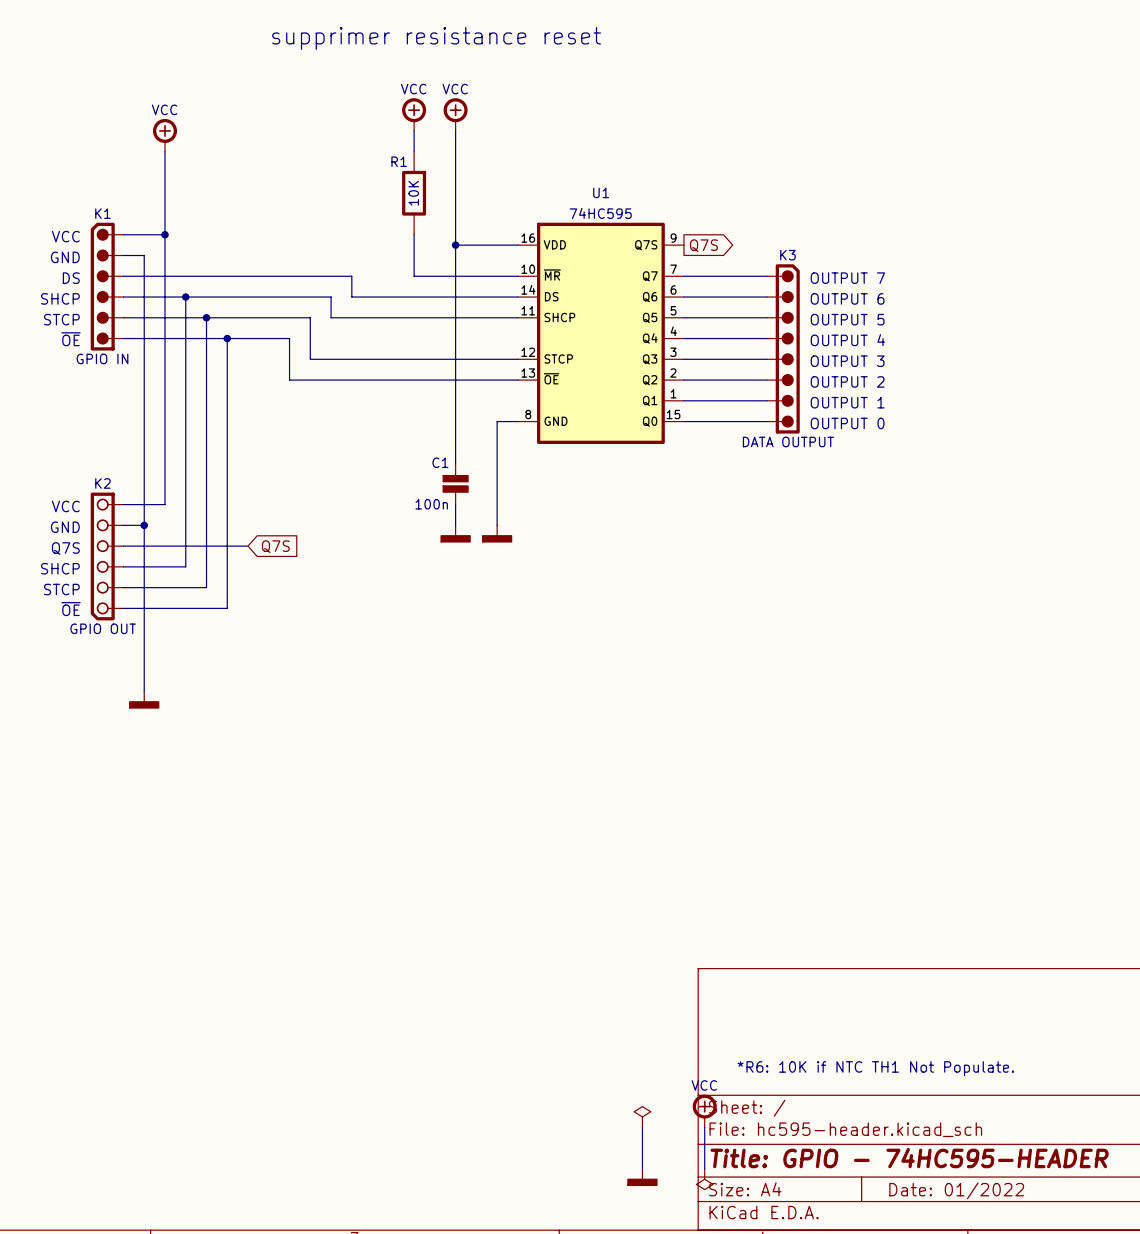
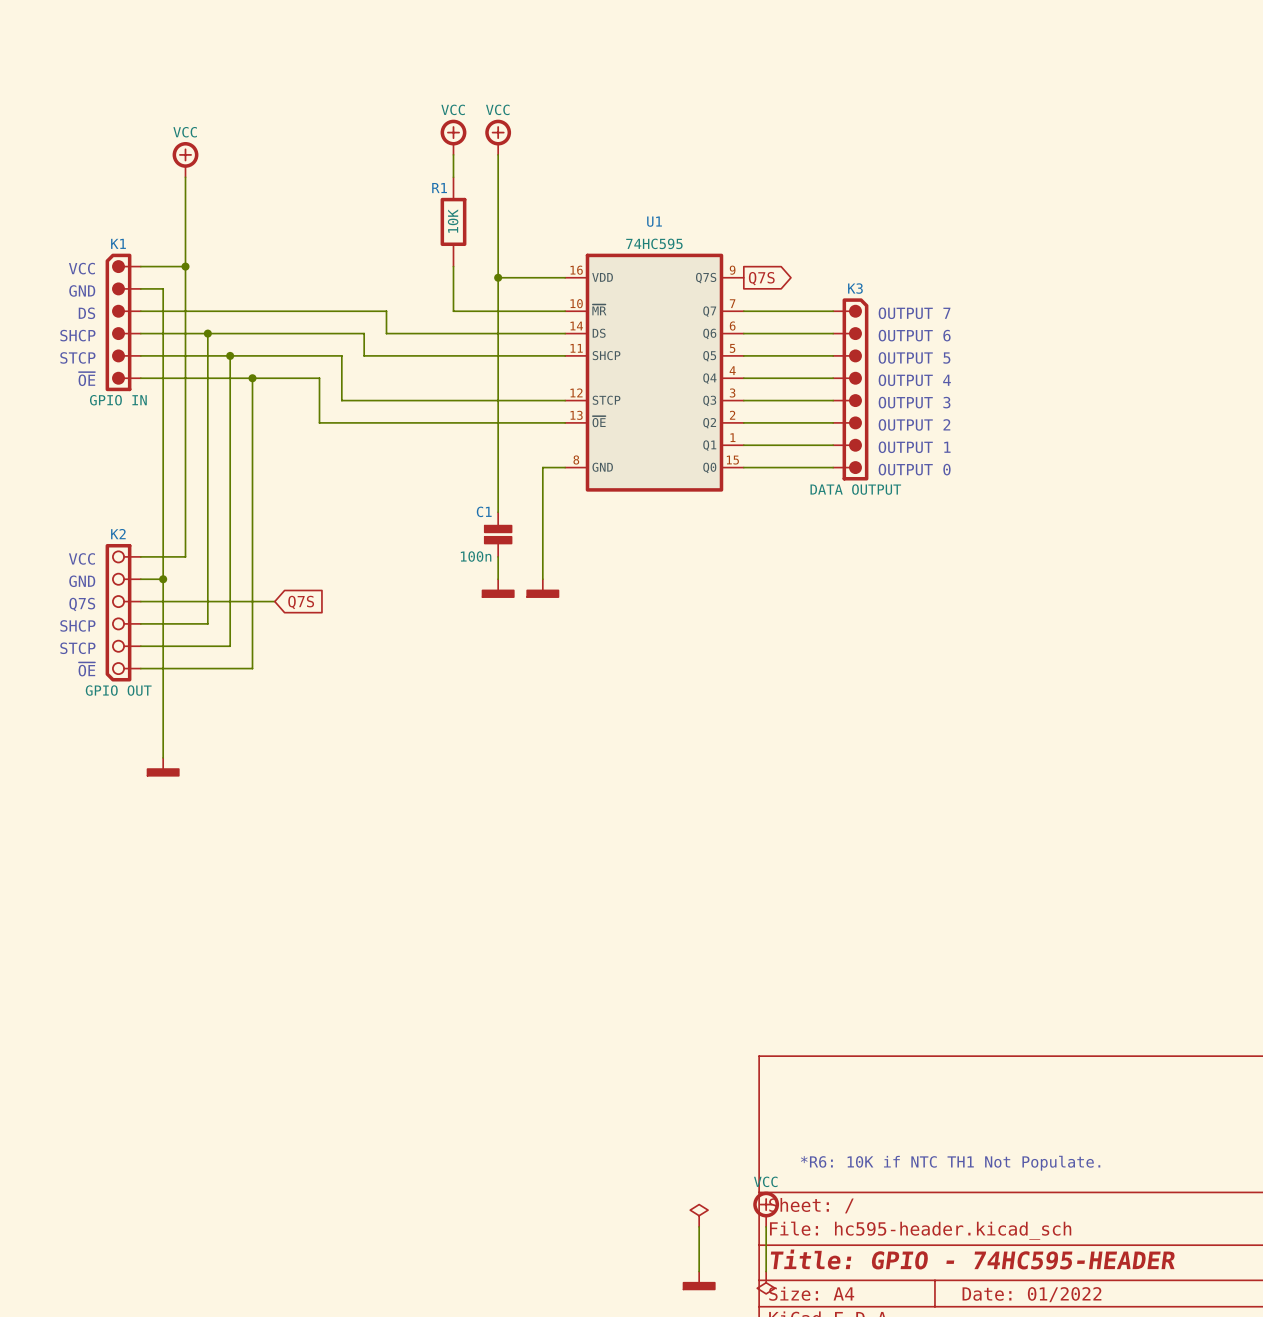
text: supprimer resistance reset (436, 38) -> none

